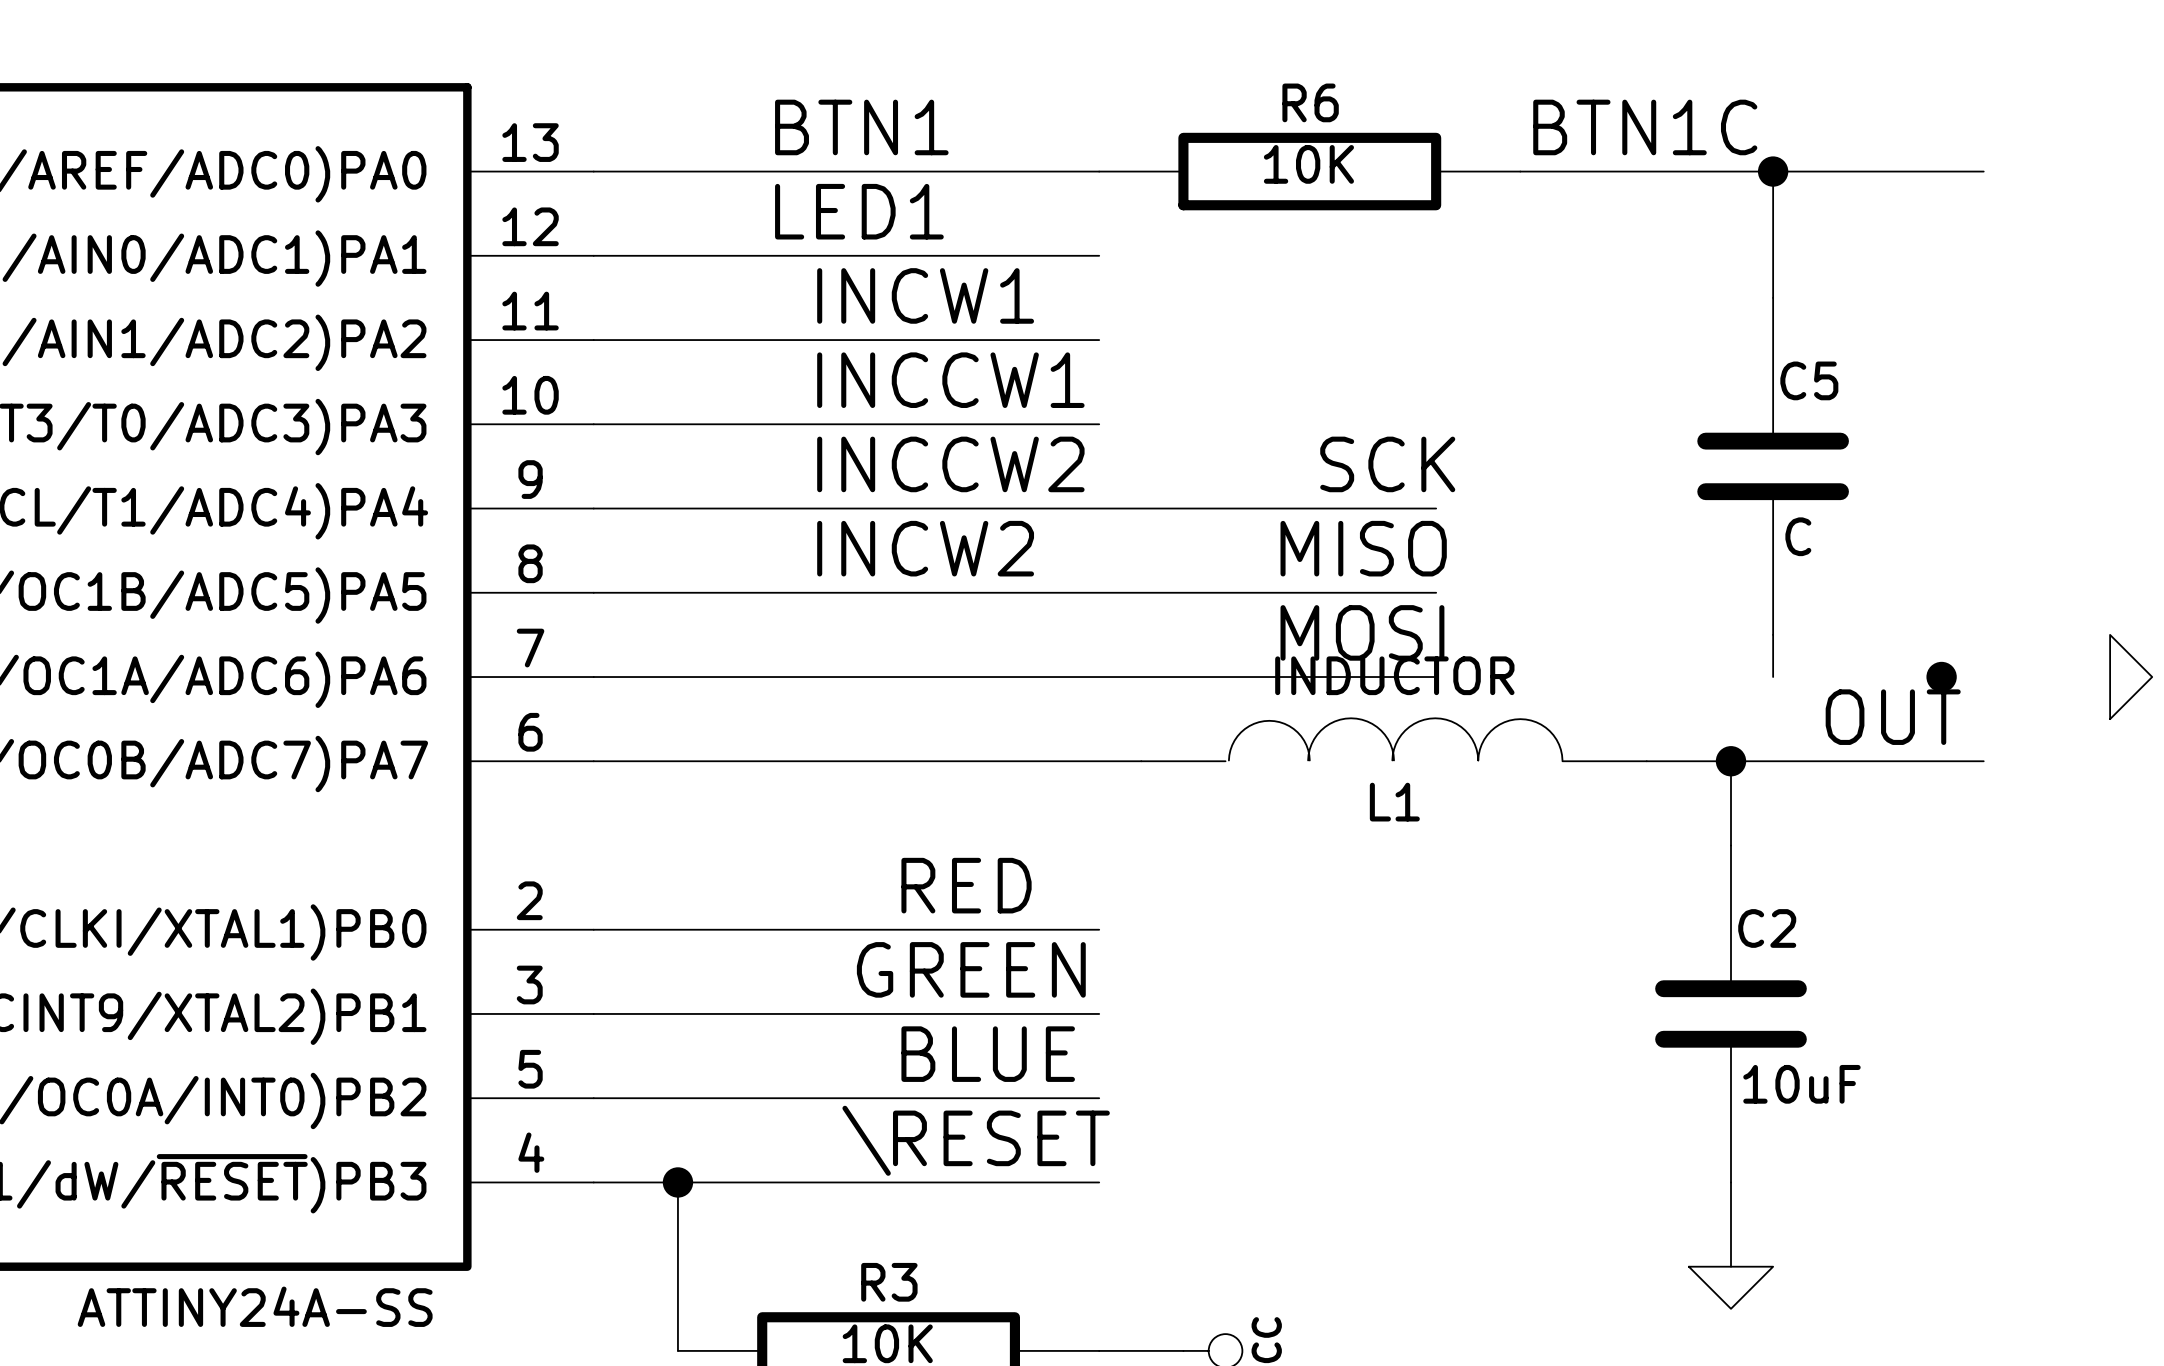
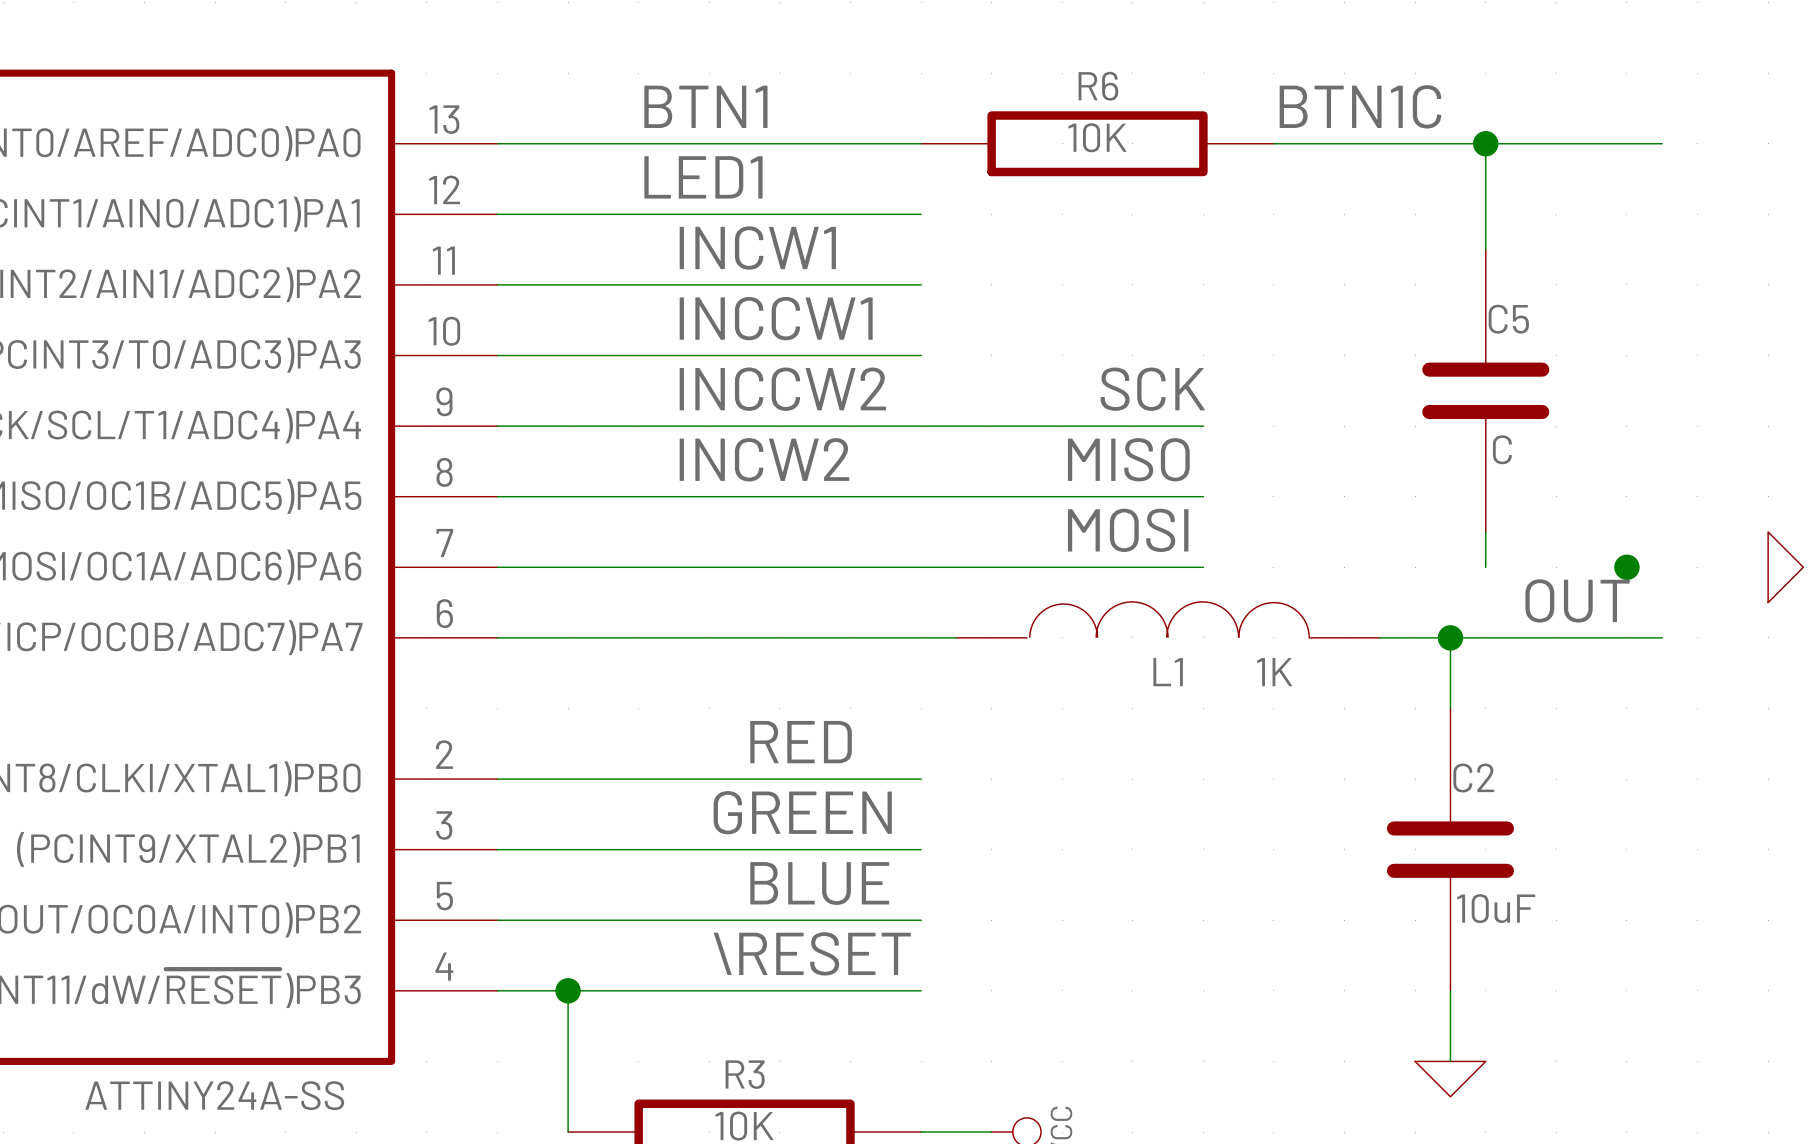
L1 value: INDUCTOR (1394, 675) -> 1K (1274, 672)

